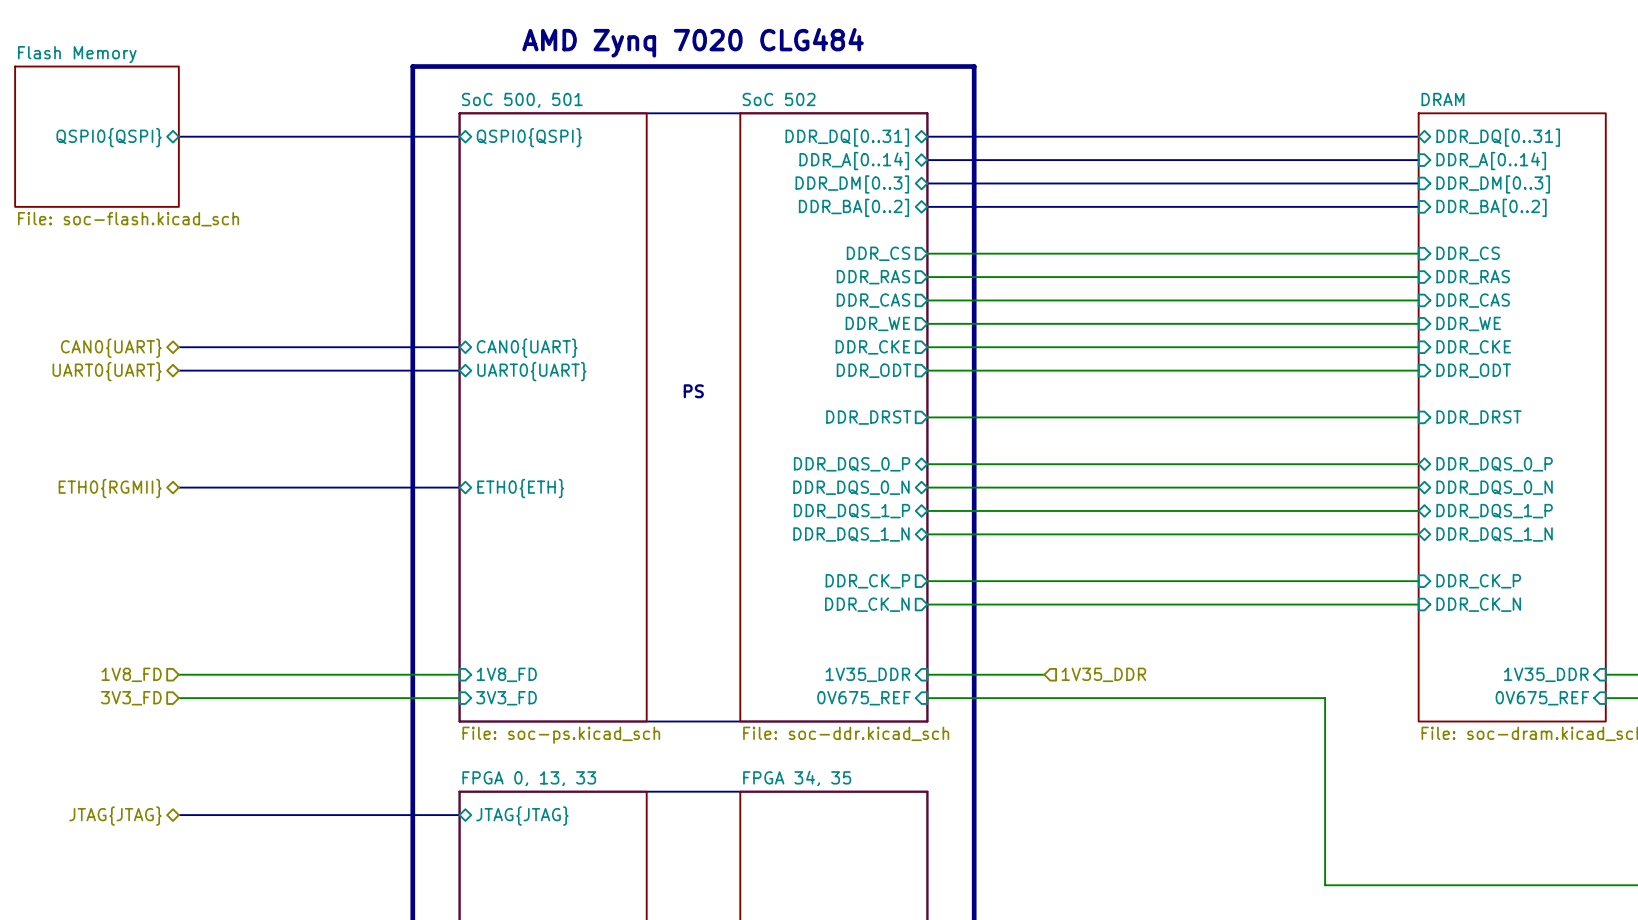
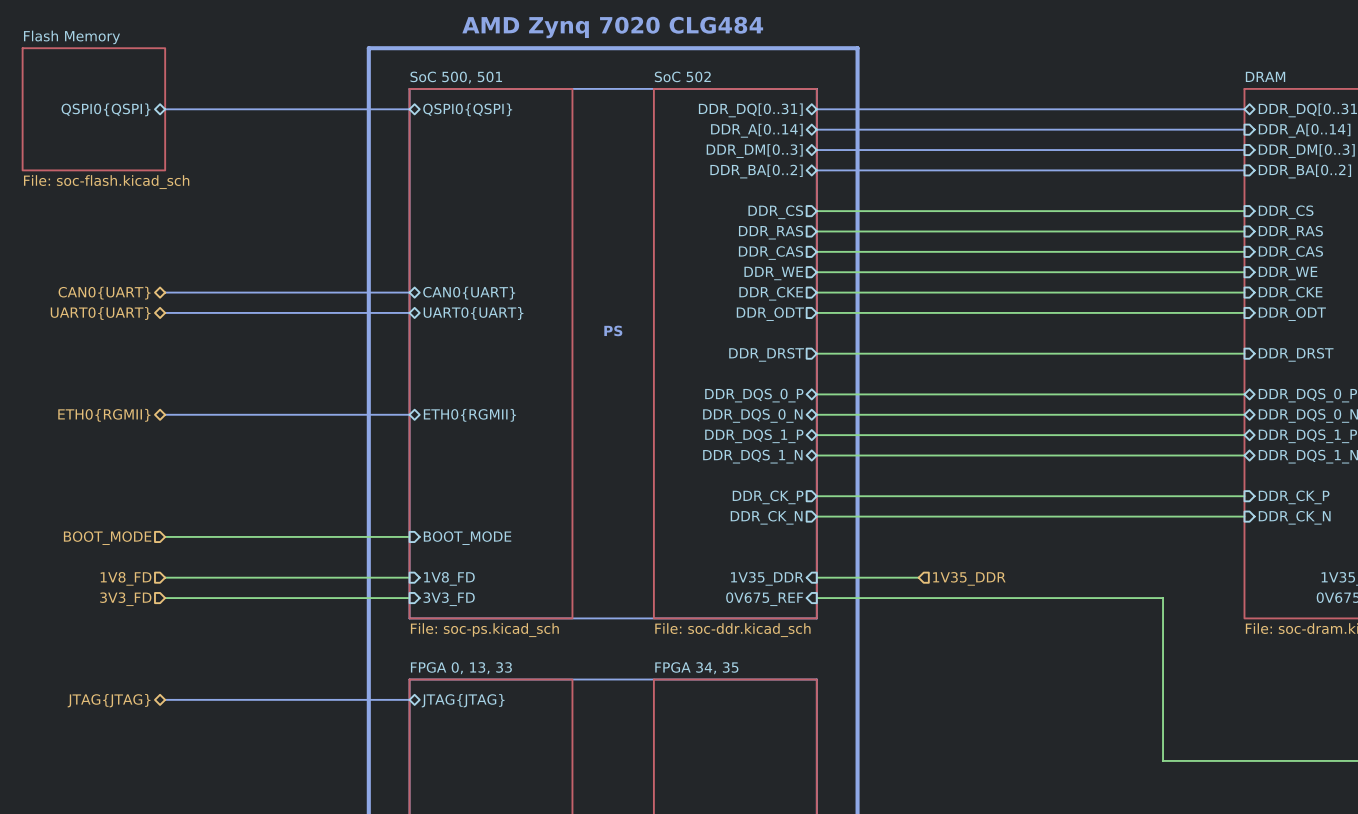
sheet pin: ETH0{ETH} (520, 488) -> ETH0{RGMII} (469, 415)
wire: none -> (165, 536) (409, 536)
hierarchical label: none -> BOOT_MODE (107, 538)
sheet pin: none -> BOOT_MODE (467, 538)

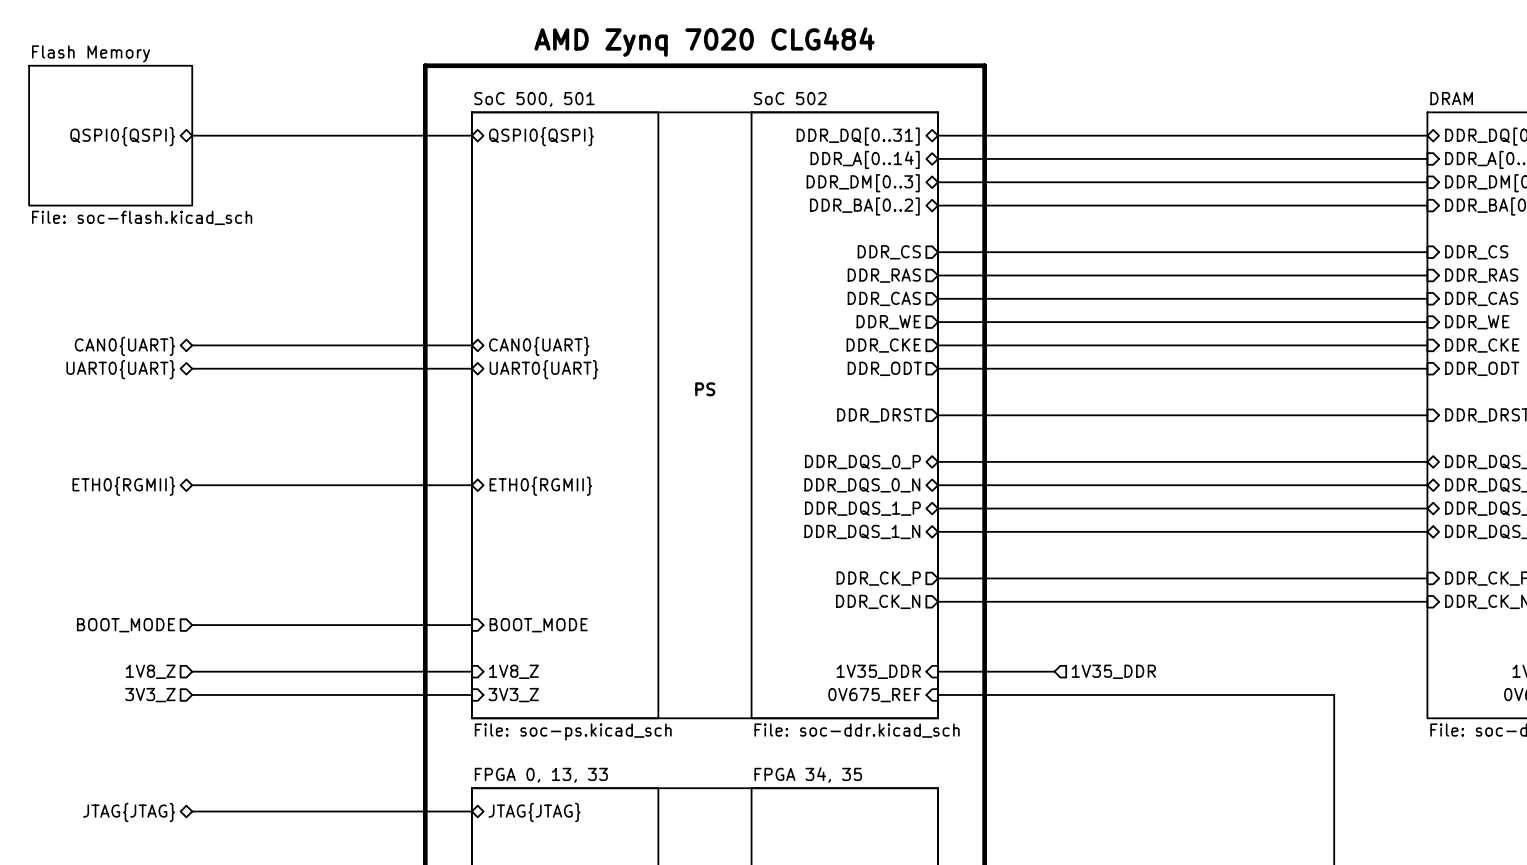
hierarchical label: 1V8_FD (126, 578) -> 1V8_Z (150, 671)
sheet pin: 1V8_FD (449, 578) -> 1V8_Z (513, 671)
hierarchical label: 3V3_FD (125, 599) -> 3V3_Z (150, 695)
sheet pin: 3V3_FD (449, 599) -> 3V3_Z (513, 695)

